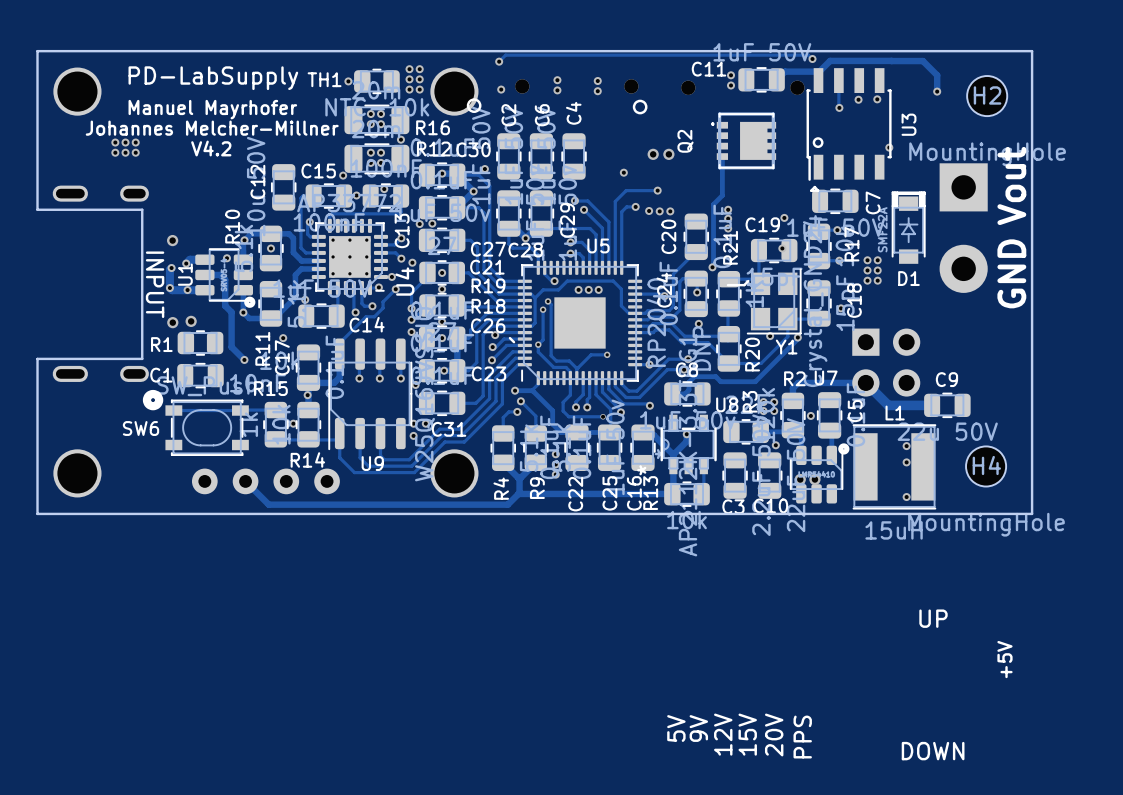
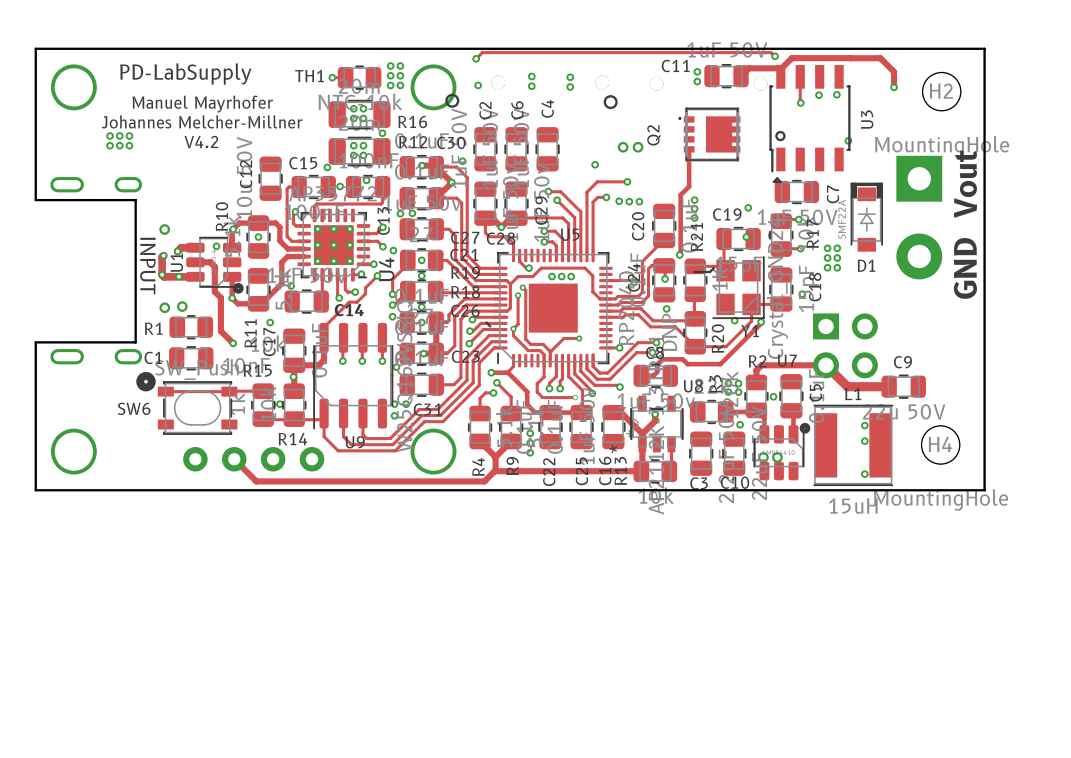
text: UP (933, 618) -> none
text: +5V (1004, 659) -> none
text: 5V (676, 728) -> none
text: 9V (698, 728) -> none
text: 12V (723, 734) -> none
text: 15V (747, 734) -> none
text: 20V (774, 734) -> none
text: PPS (802, 737) -> none
text: DOWN (933, 751) -> none

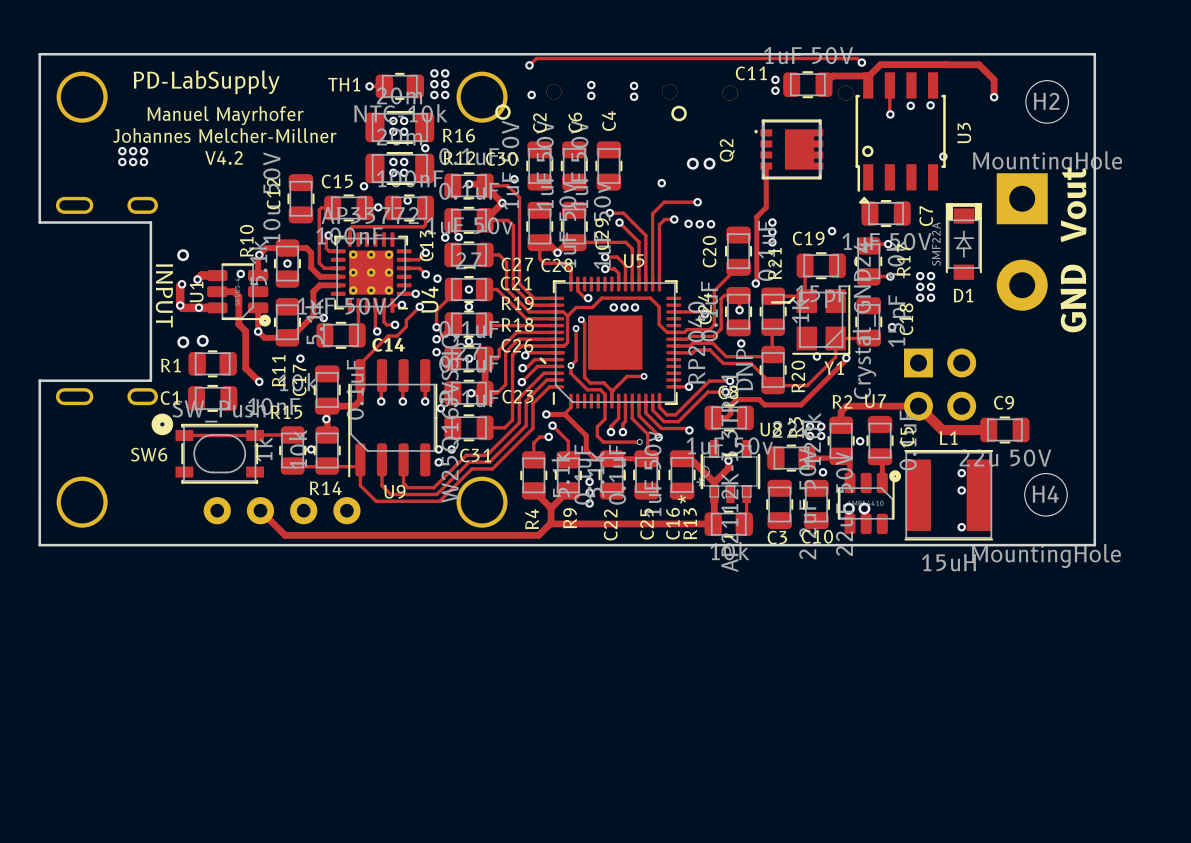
via: (746, 237) -> none

